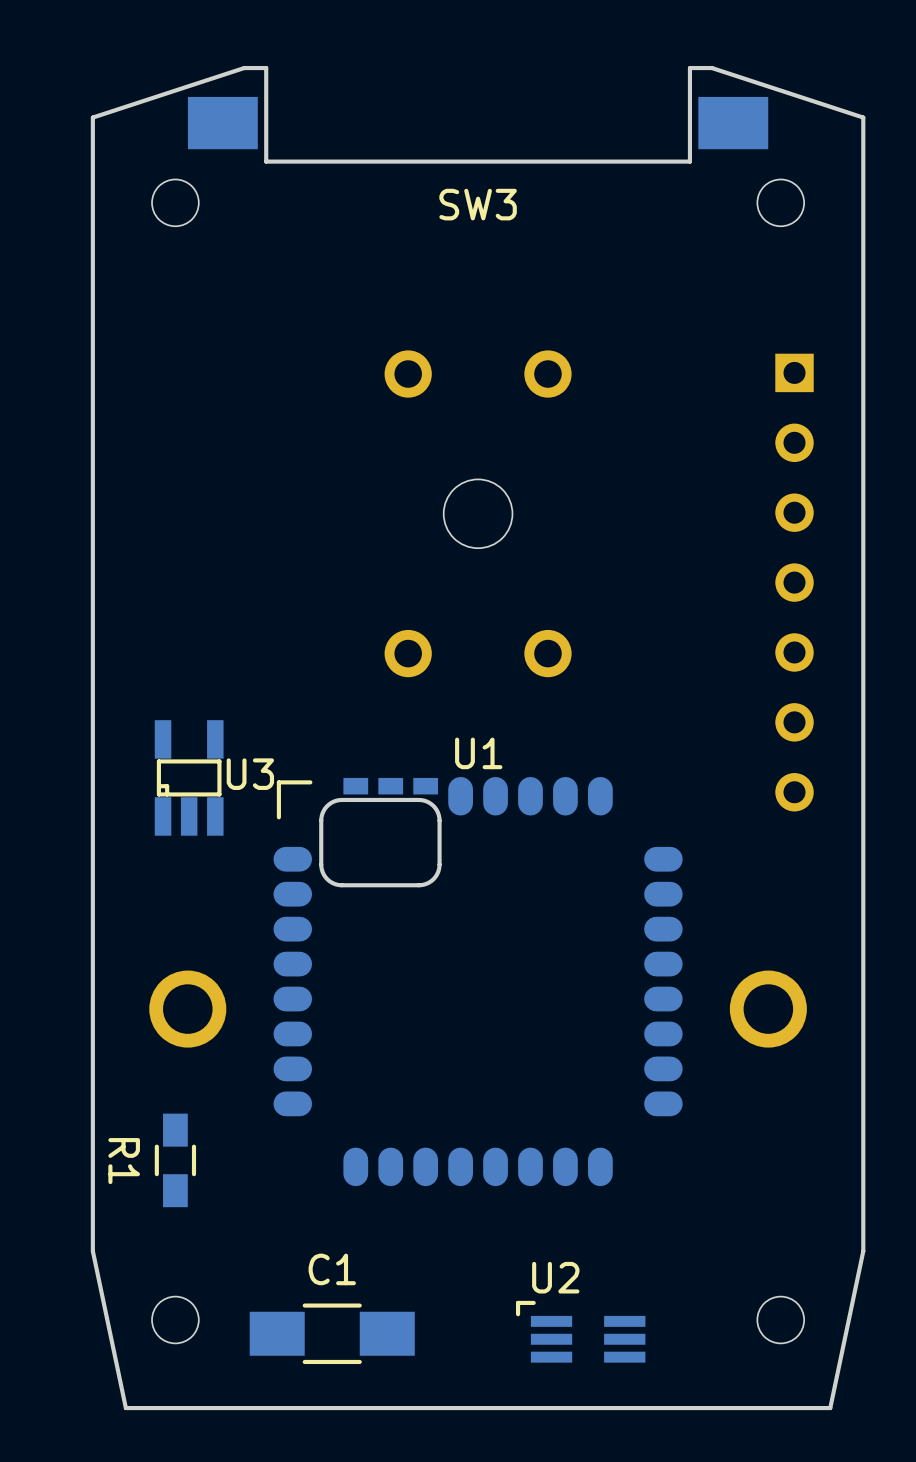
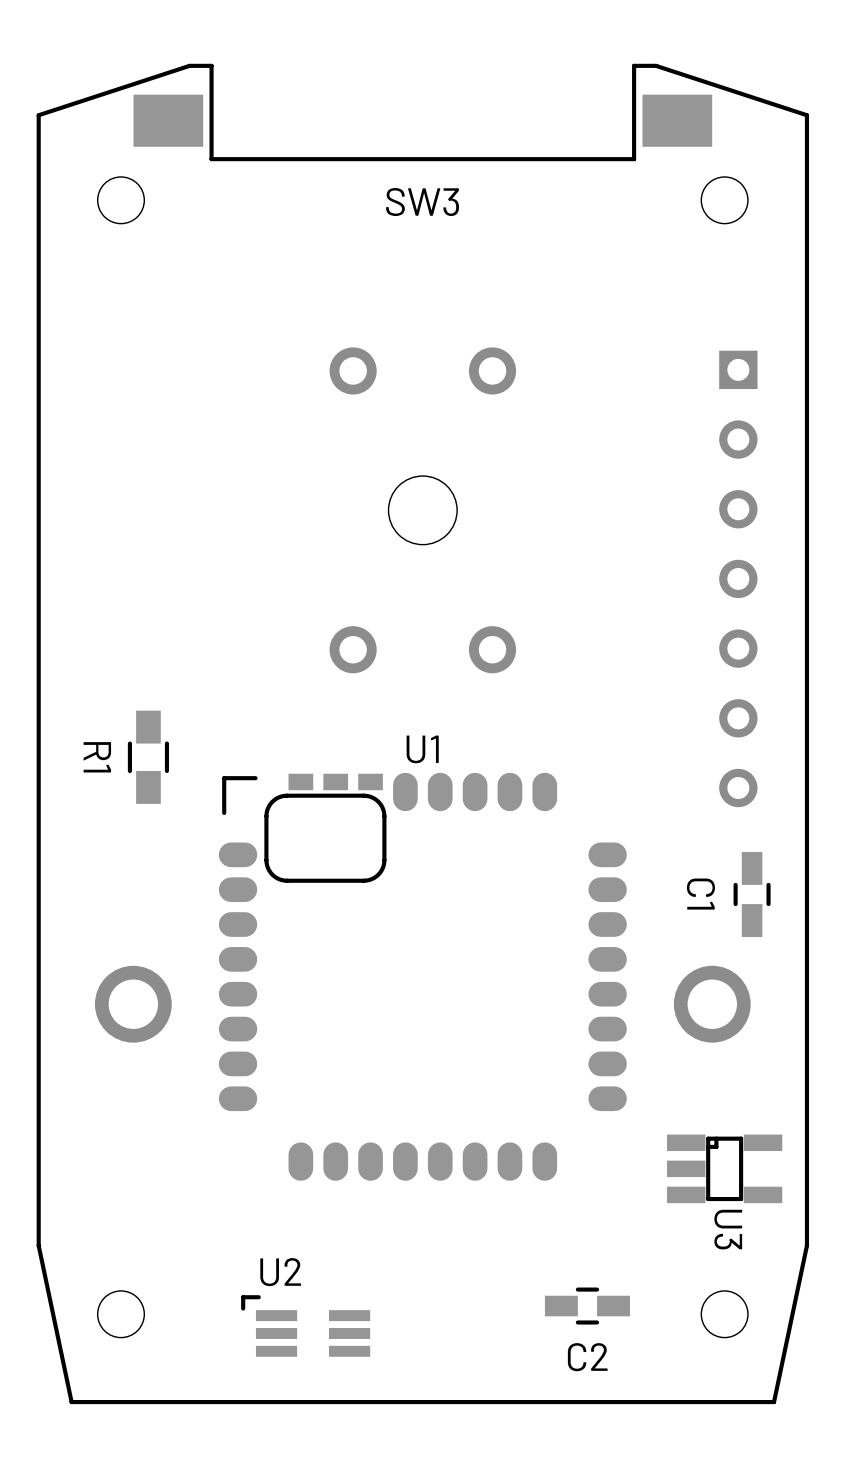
U3 rotation: 0° (189, 777) -> 90° clockwise (724, 1168)
U3 position: (189, 777) -> (724, 1168)
R1 position: (175, 1160) -> (148, 757)
C1 name position: C1 (332, 1269) -> C1 (700, 894)
C1 footprint: [249, 1303, 415, 1365] -> [733, 851, 771, 938]
C2: none -> (587, 1306)
U2 position: (580, 1331) -> (305, 1325)

